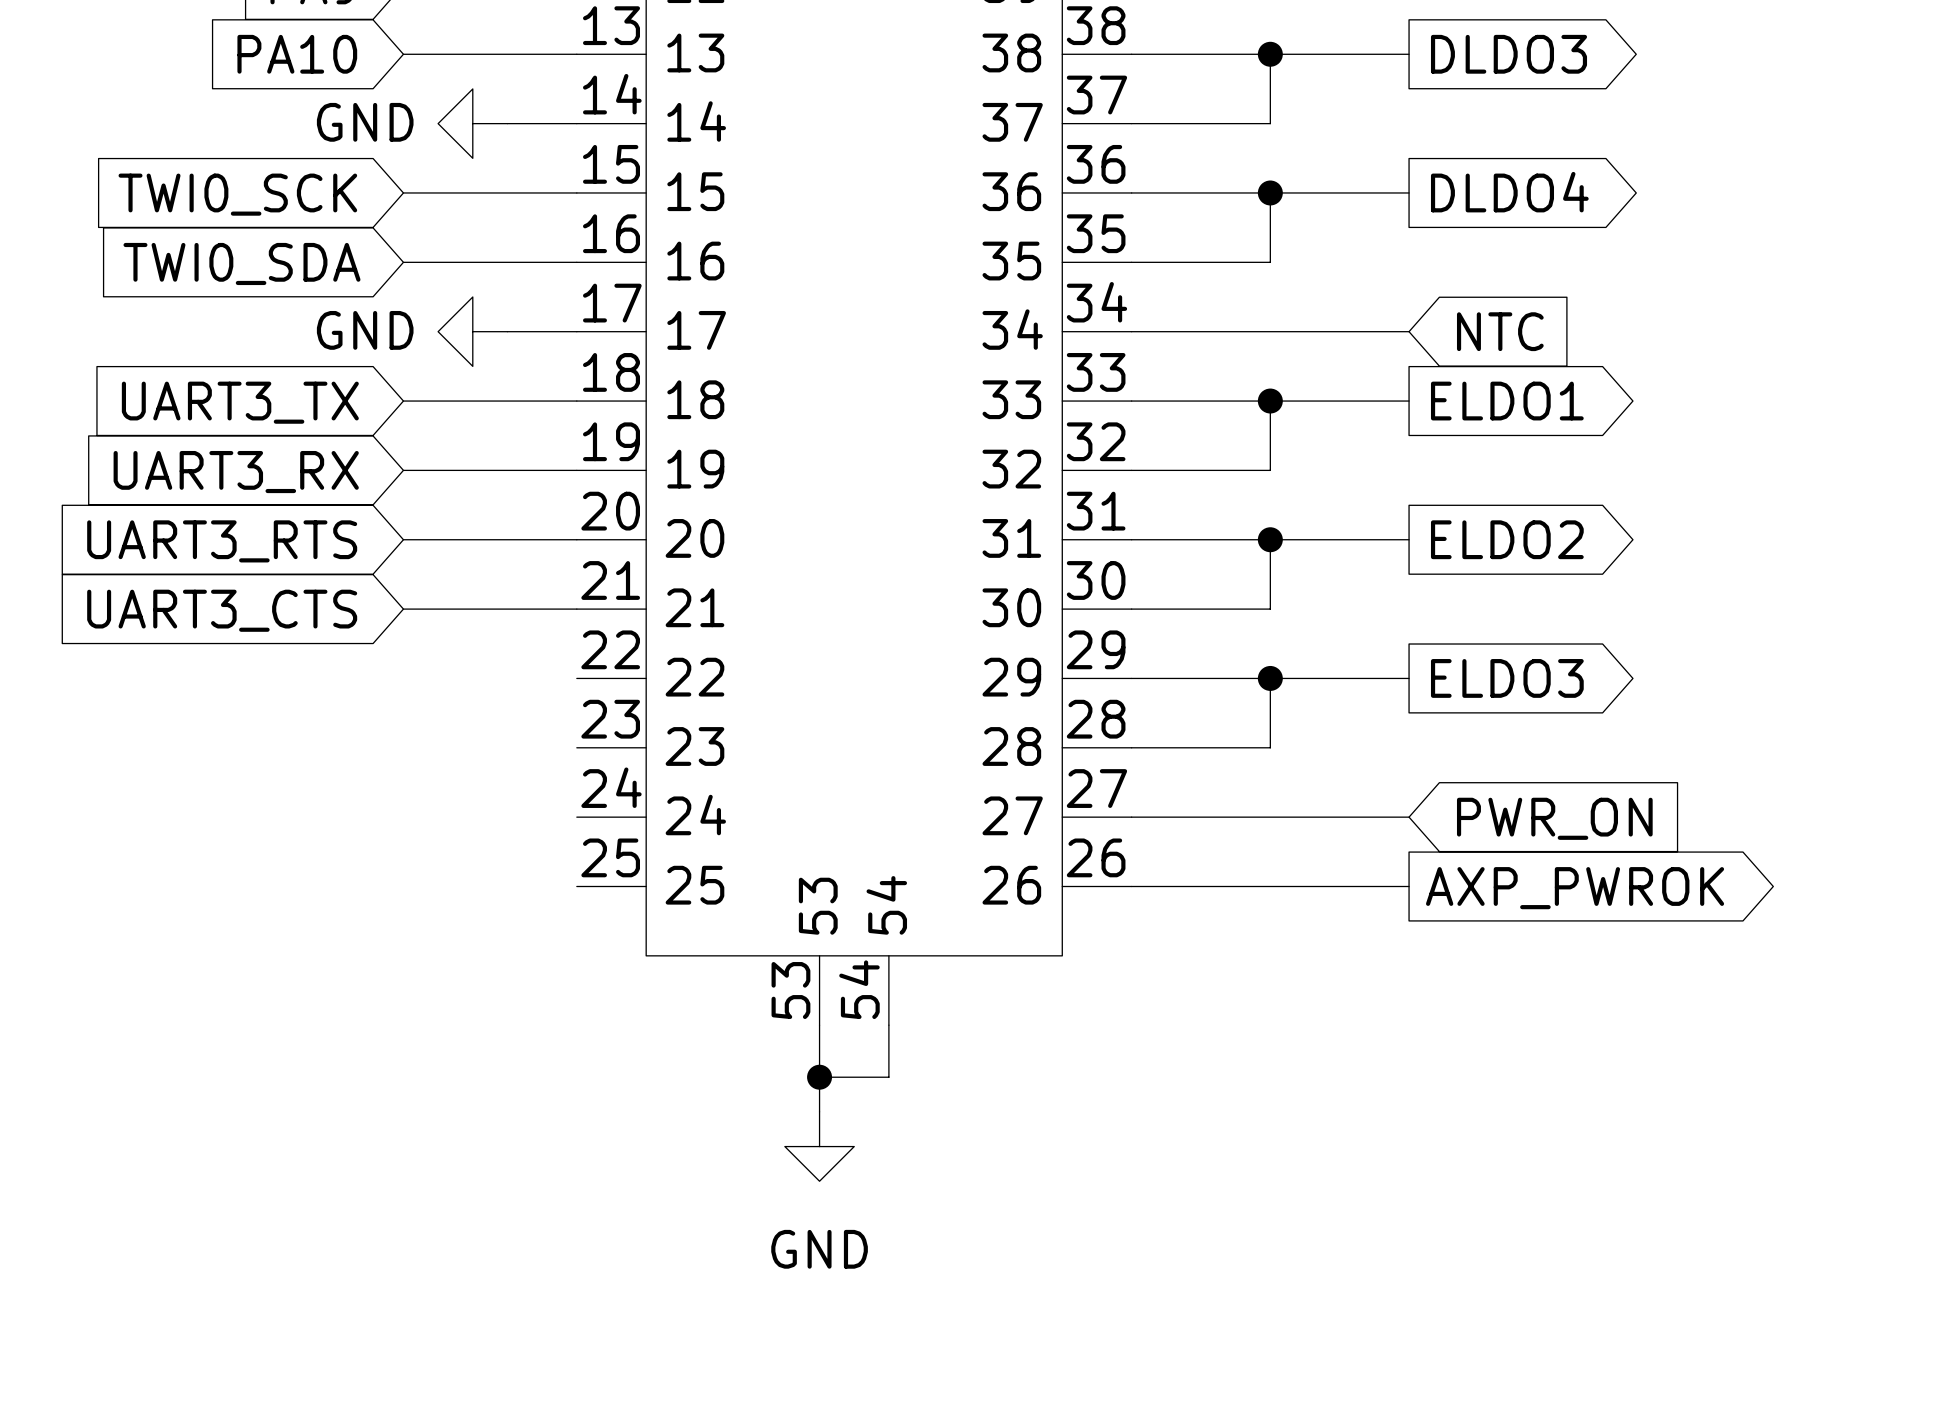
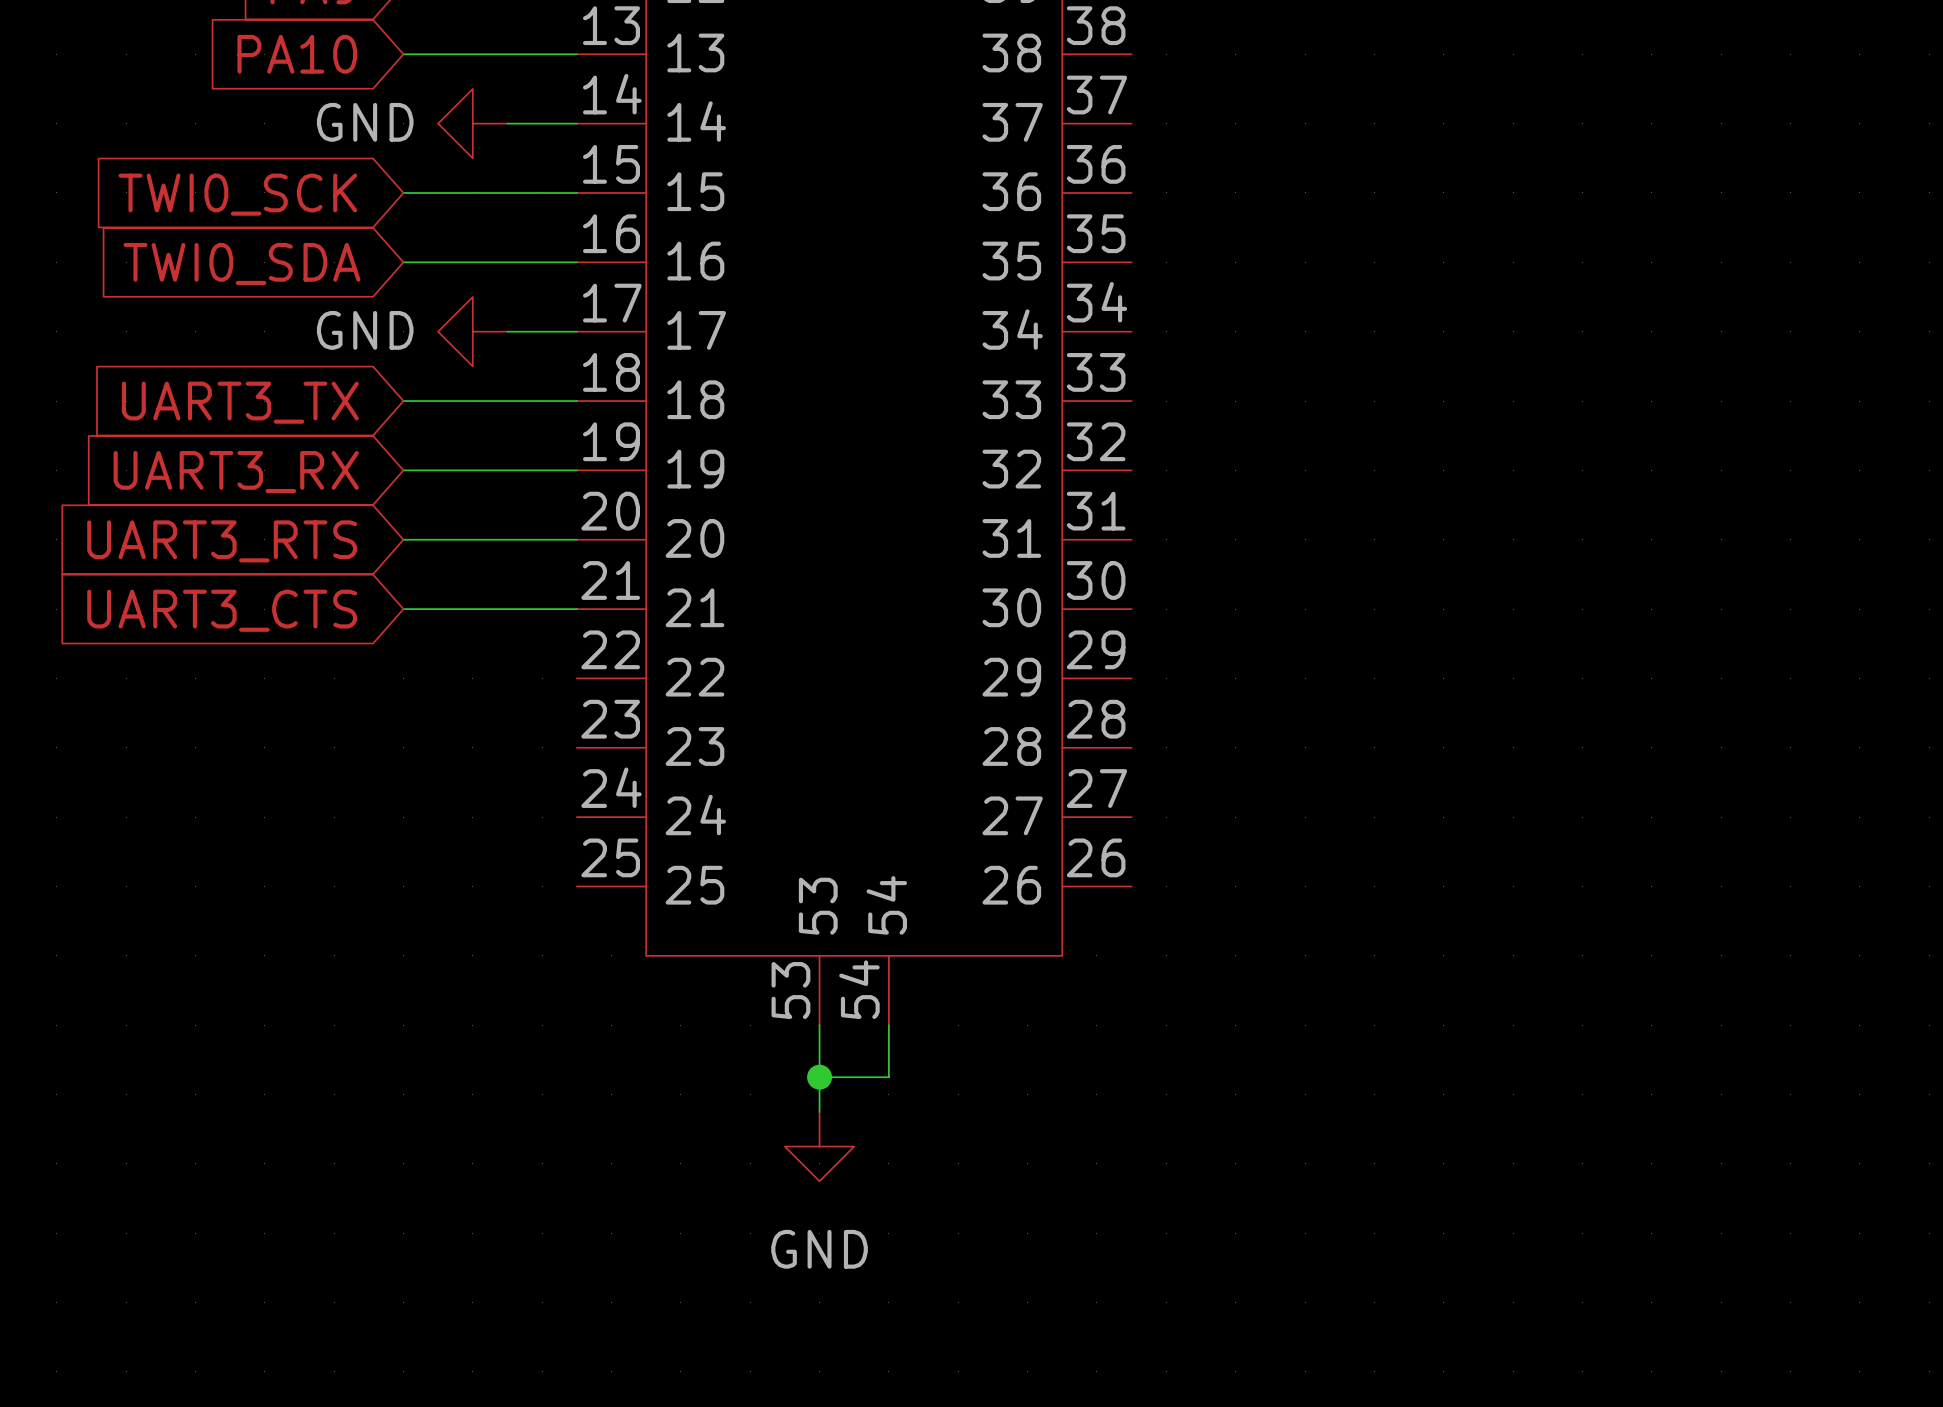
wire: (1131, 54) (1409, 54) -> none
wire: (1270, 54) (1270, 123) (1131, 123) -> none
junction: (1270, 54) -> none
global label: DLDO3 (1509, 54) -> none
wire: (1131, 192) (1409, 192) -> none
wire: (1270, 192) (1270, 262) (1131, 262) -> none
junction: (1270, 192) -> none
global label: DLDO4 (1509, 192) -> none
wire: (1131, 331) (1409, 331) -> none
global label: NTC (1500, 331) -> none
wire: (1131, 401) (1409, 401) -> none
wire: (1270, 401) (1270, 470) (1131, 470) -> none
junction: (1270, 401) -> none
global label: ELDO1 (1507, 401) -> none
wire: (1131, 539) (1409, 539) -> none
wire: (1270, 539) (1270, 609) (1131, 609) -> none
junction: (1270, 539) -> none
global label: ELDO2 (1507, 539) -> none
wire: (1131, 678) (1409, 678) -> none
wire: (1270, 678) (1270, 747) (1131, 747) -> none
junction: (1270, 678) -> none
global label: ELDO3 (1507, 678) -> none
wire: (1131, 817) (1409, 817) -> none
global label: PWR_ON (1554, 818) -> none
wire: (1131, 886) (1409, 886) -> none
global label: AXP_PWROK (1575, 888) -> none

